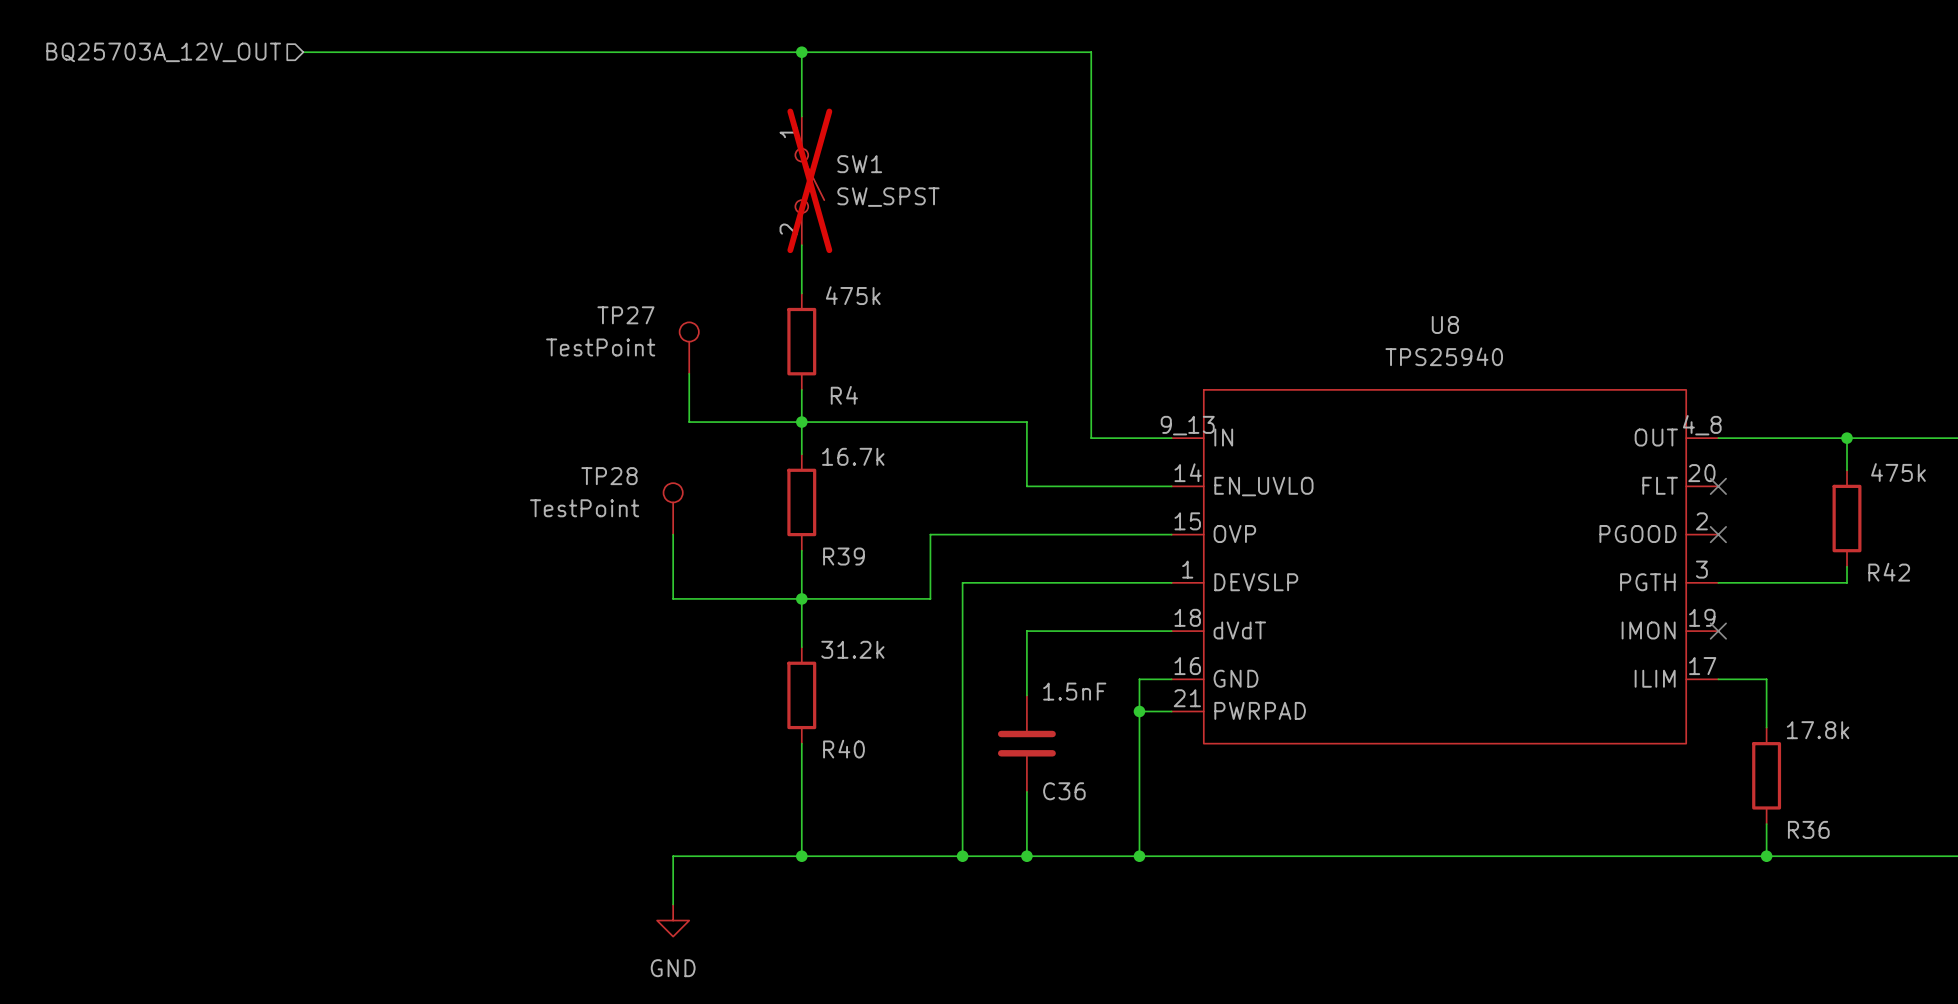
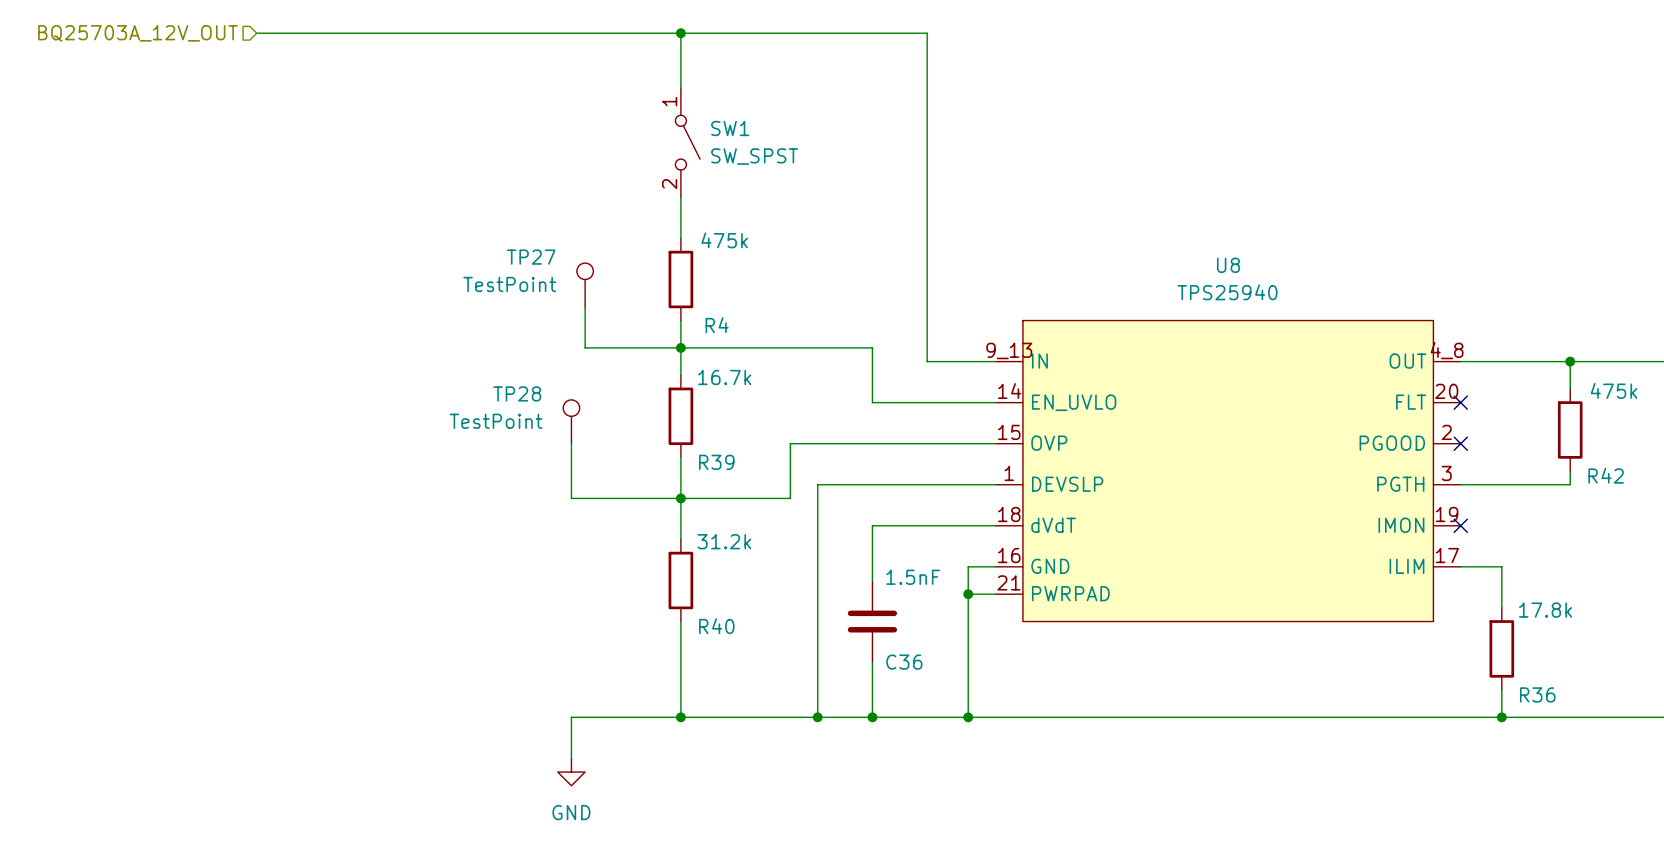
SW1 do-not-place cross: (809, 180) -> none

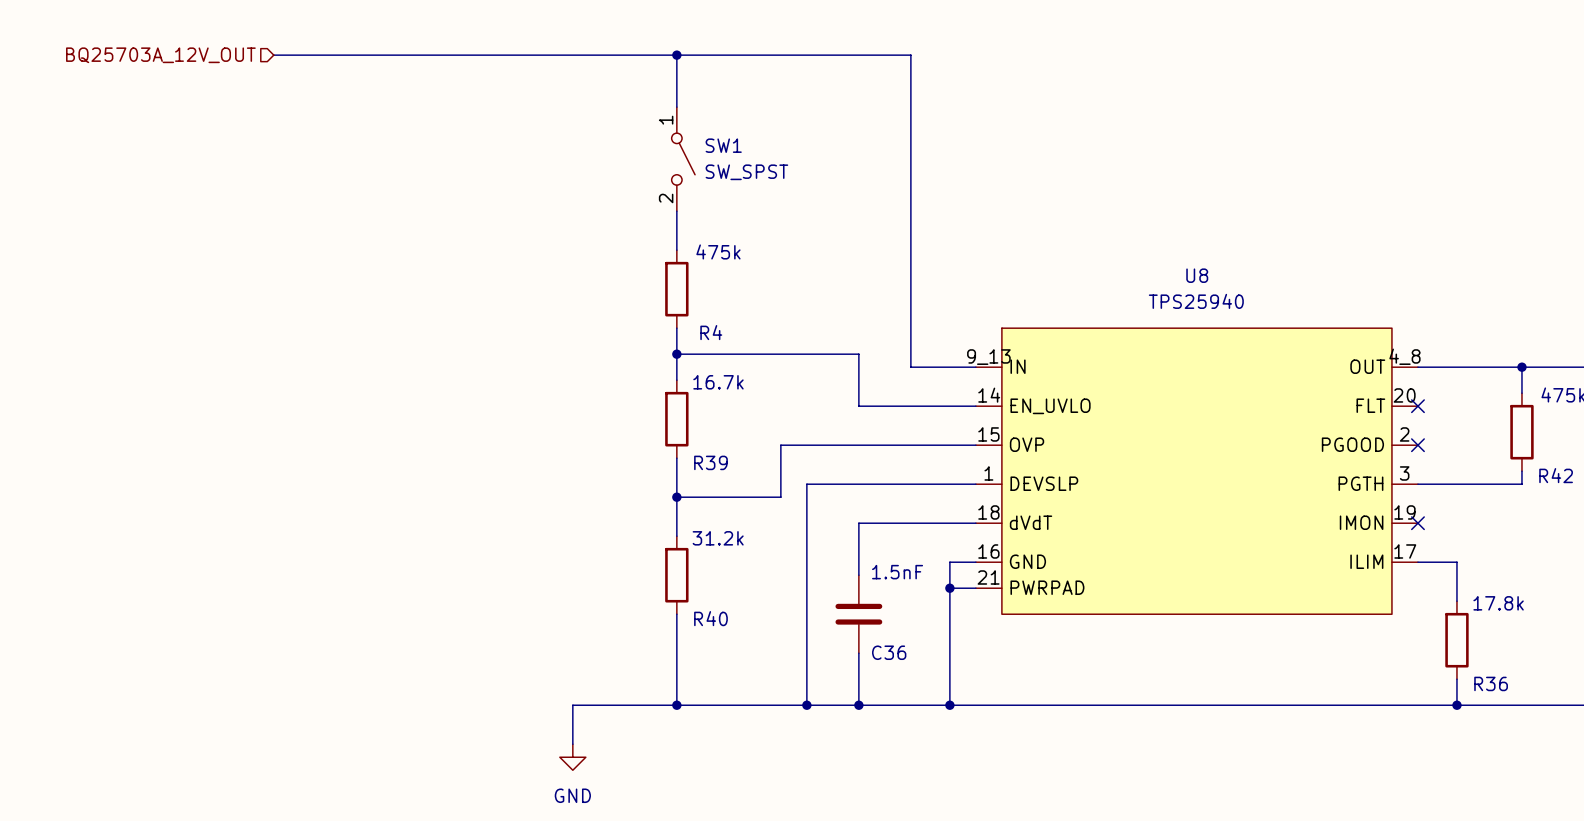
TP27: TestPoint (585, 284) -> none
wire: (585, 306) (585, 347) (680, 347) -> none
TP28: TestPoint (571, 421) -> none
wire: (571, 443) (571, 498) (680, 498) -> none

